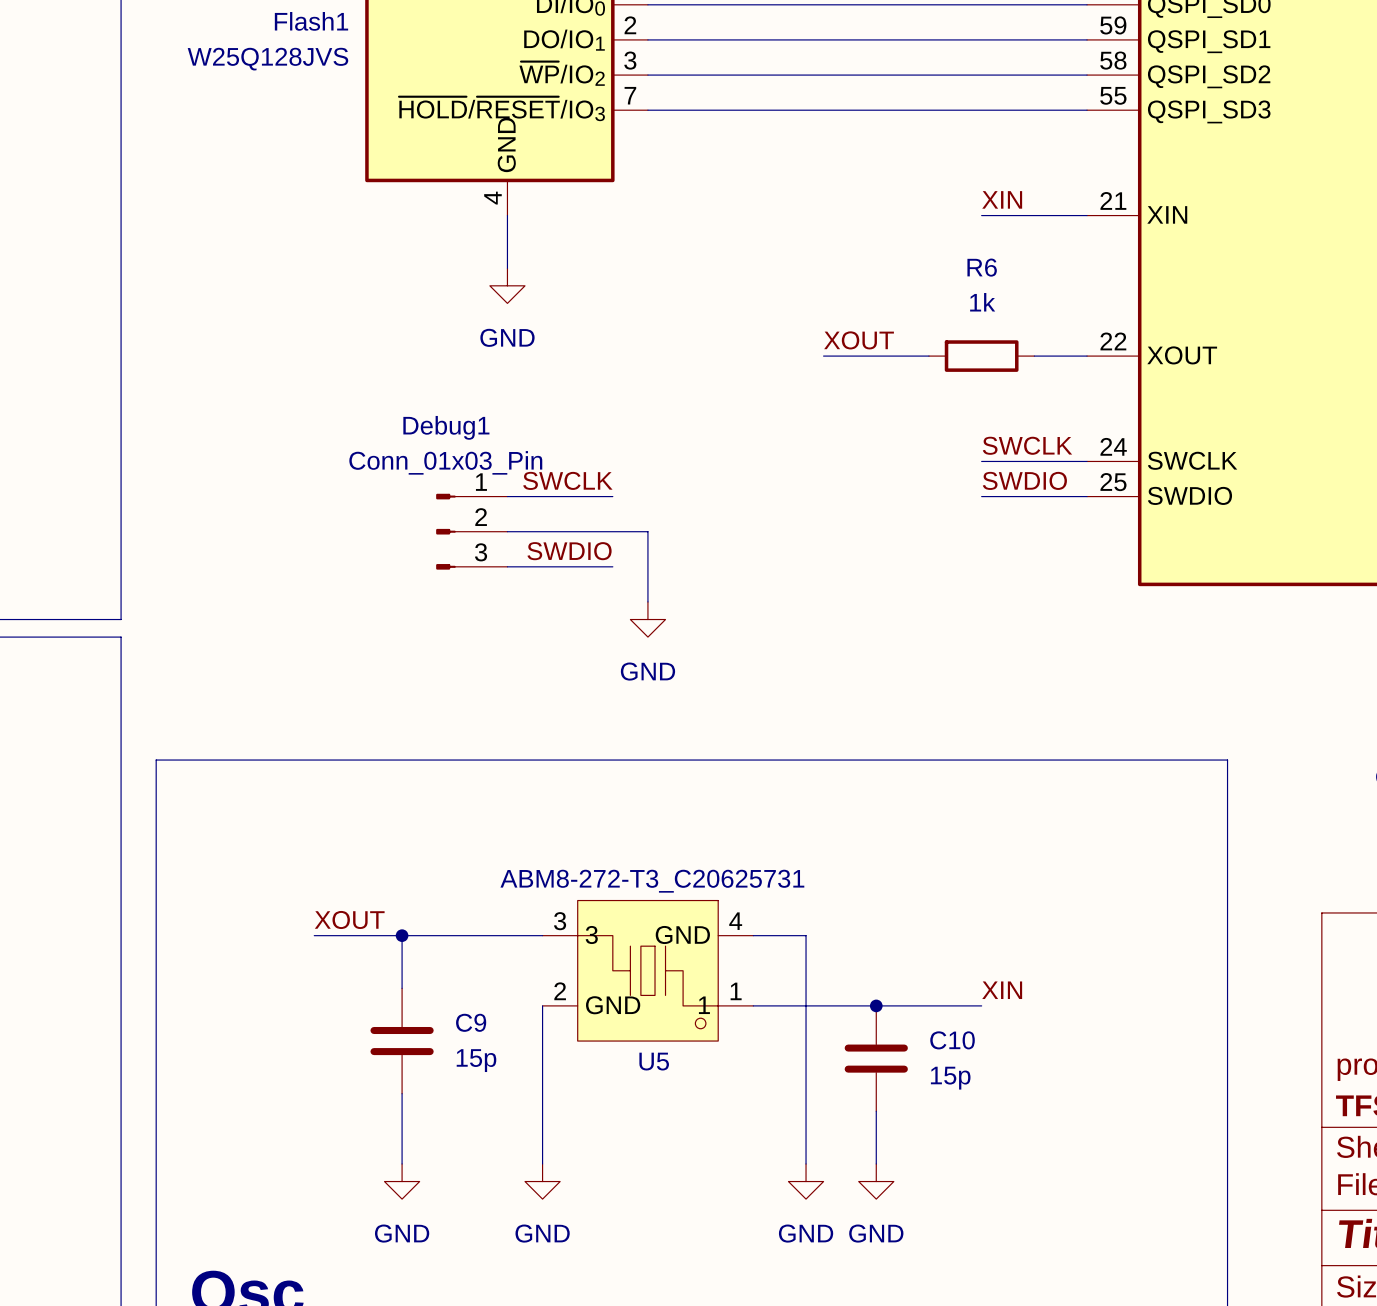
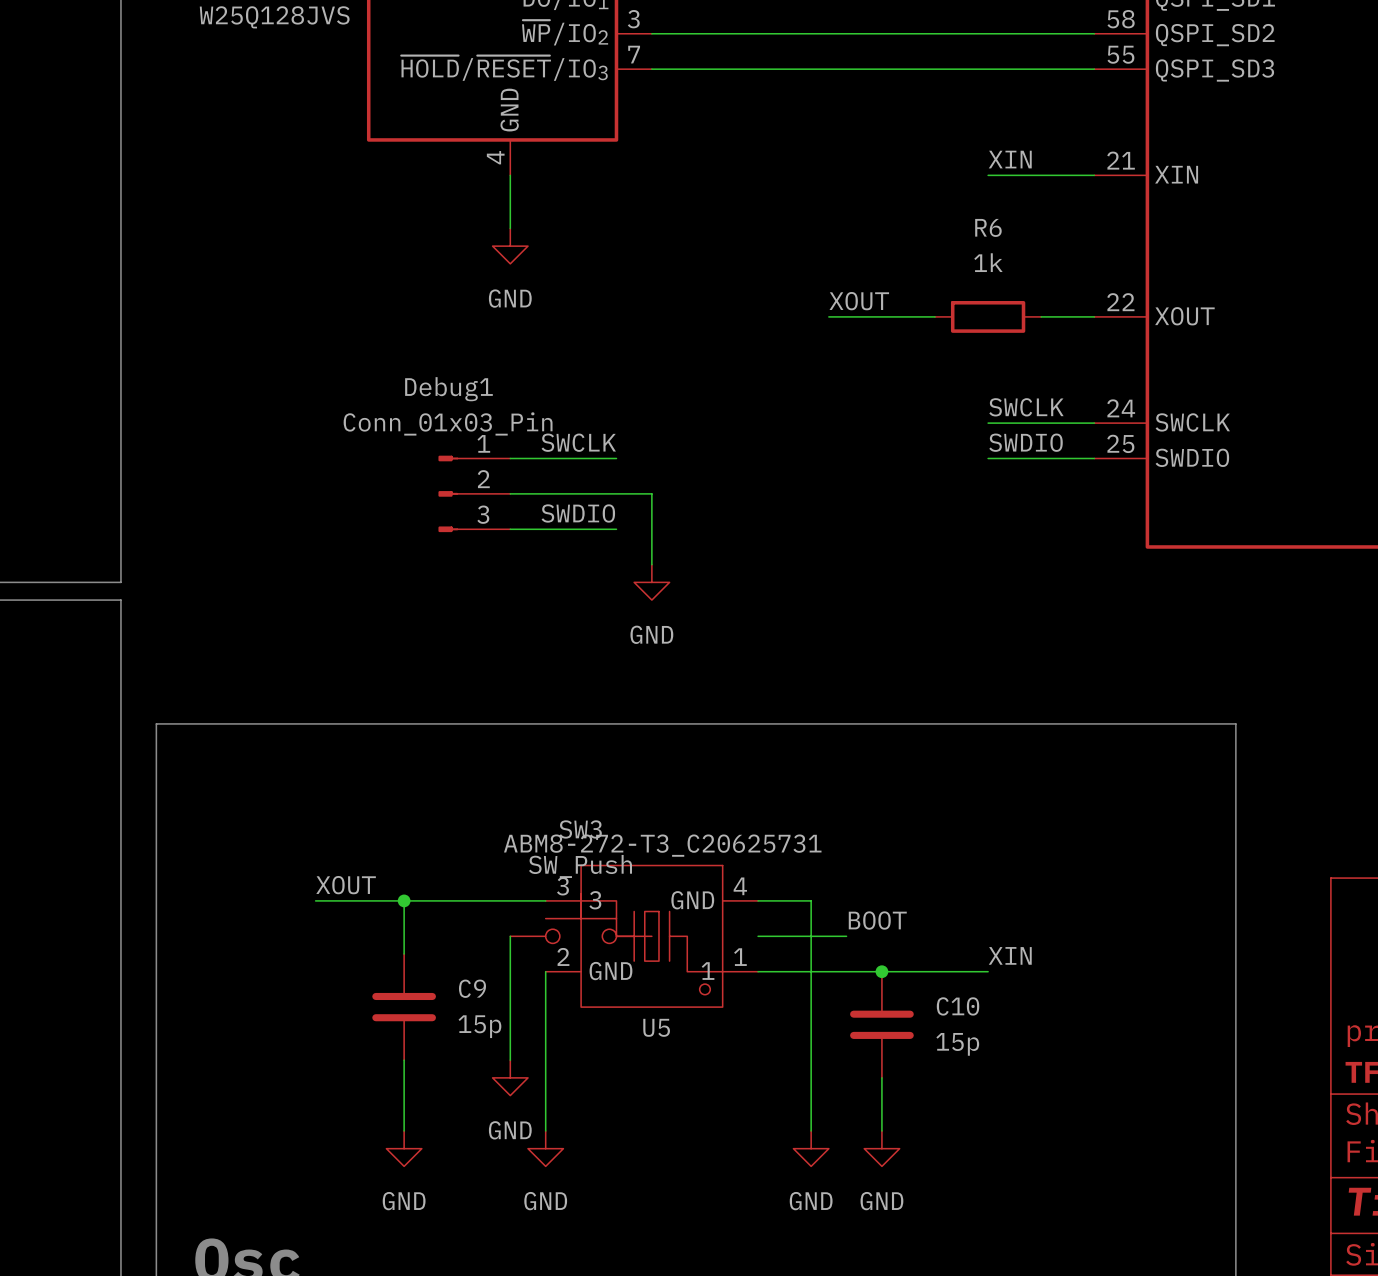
SW3: none -> SW_Push (581, 918)
label: none -> BOOT (877, 920)
wire: none -> (510, 936) (510, 1060)
wire: none -> (758, 936) (846, 936)
power symbol: none -> GND (510, 1077)

